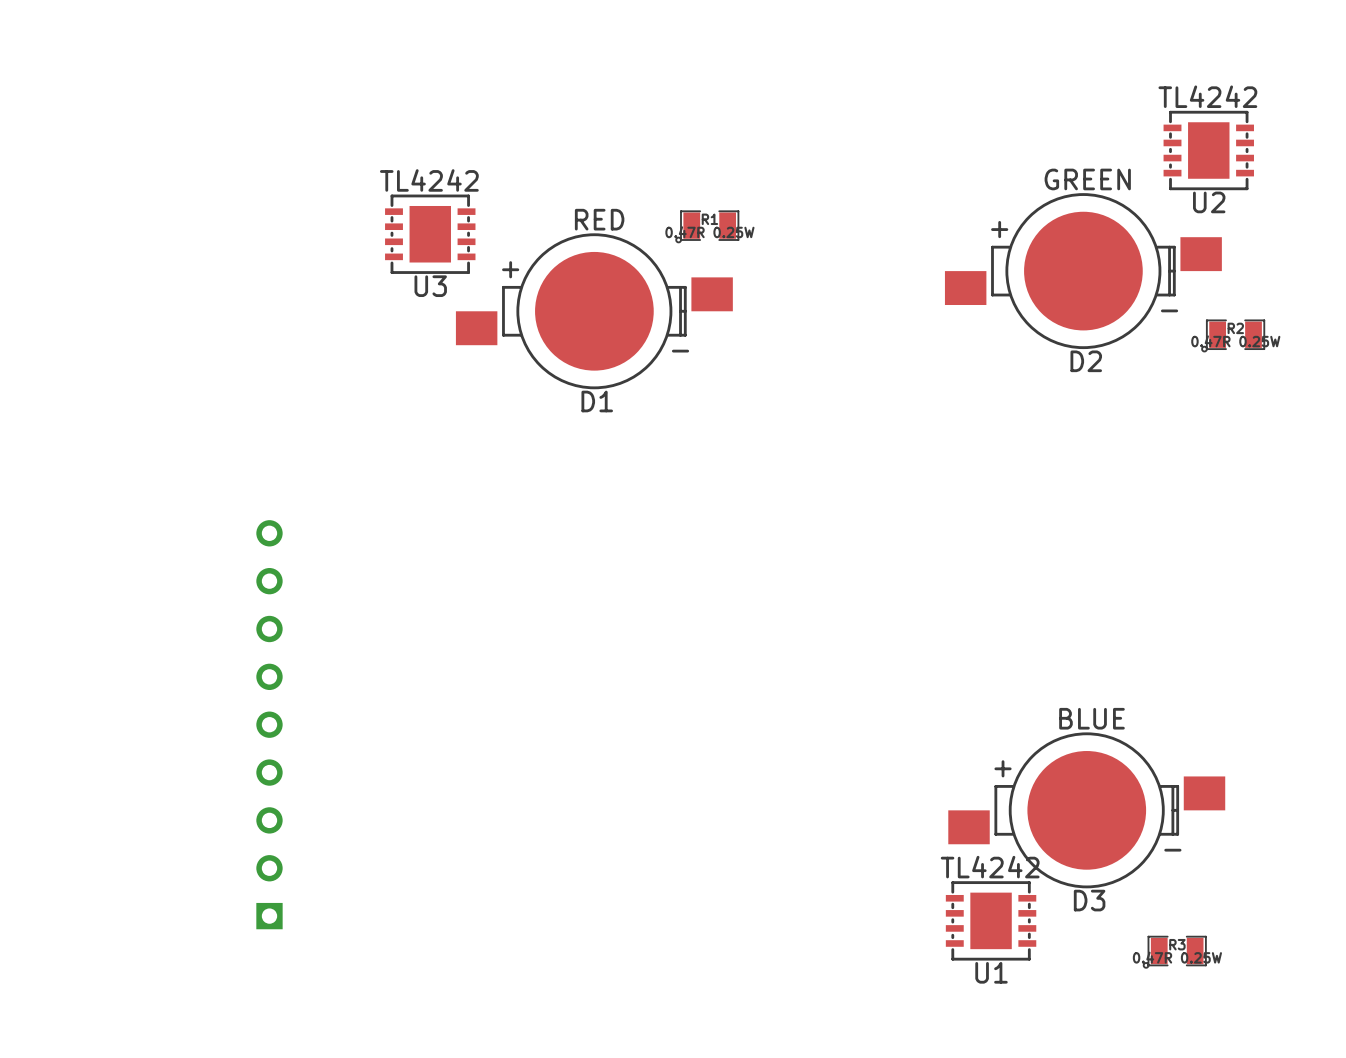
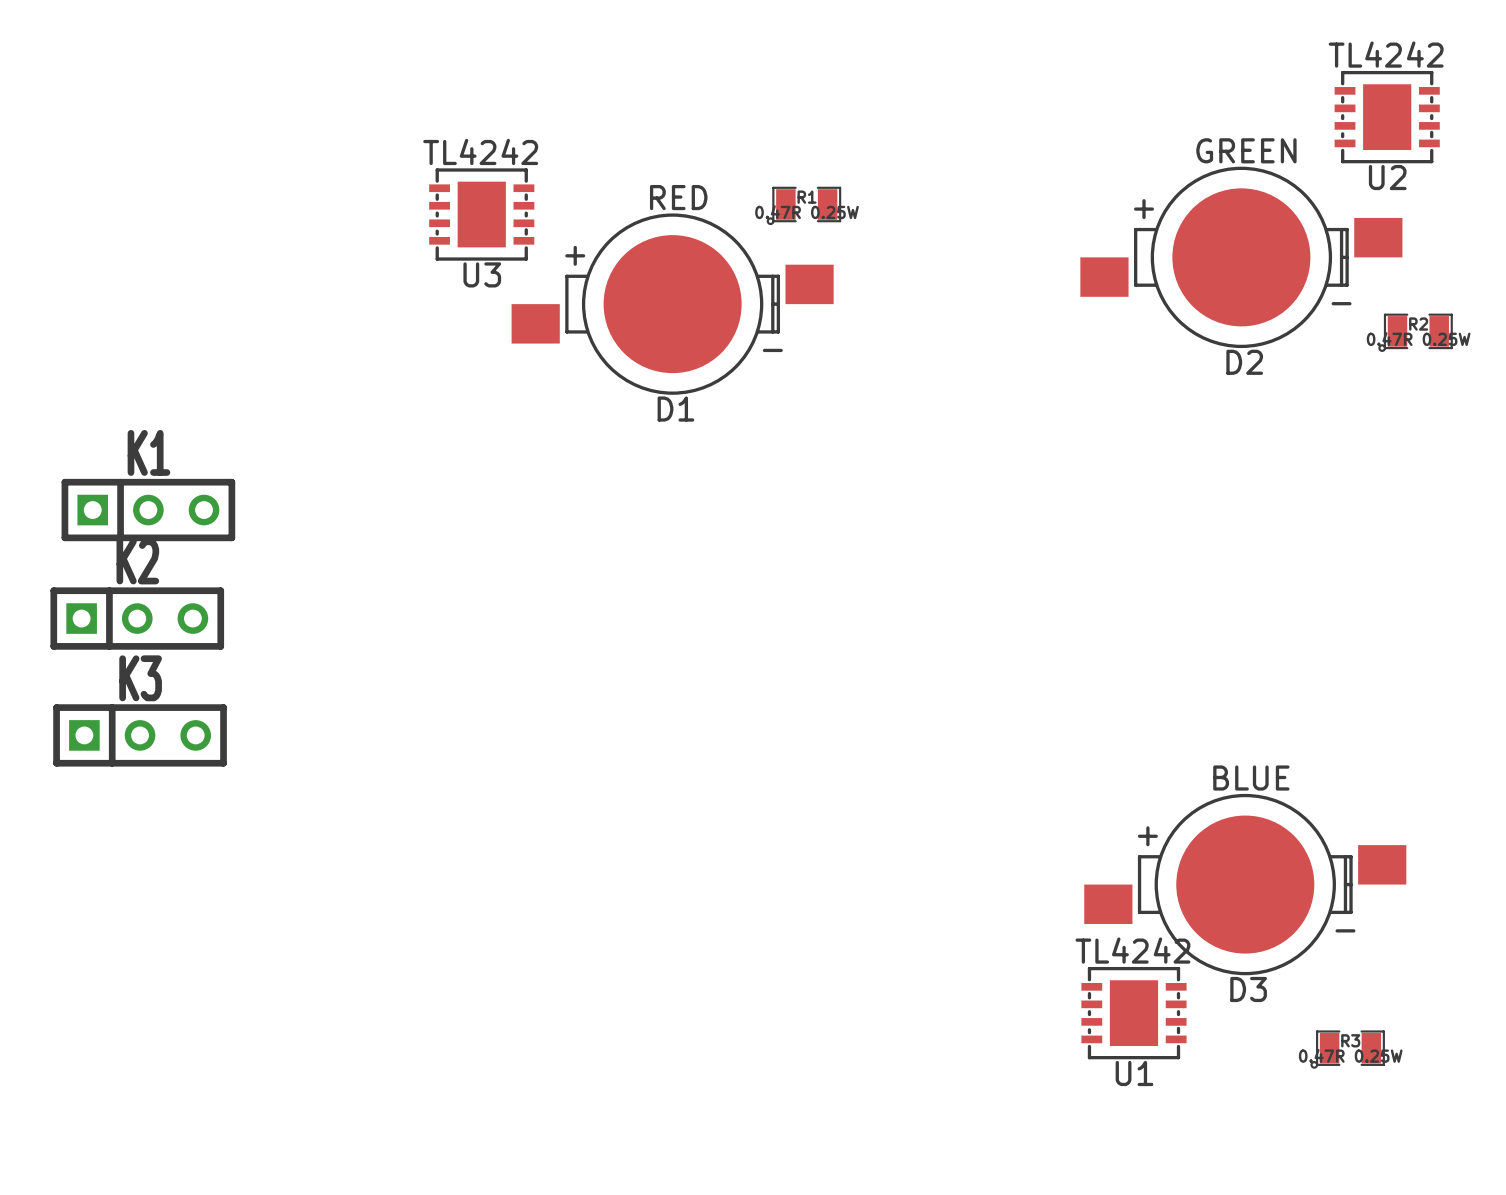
K1: none -> (148, 510)
K2: none -> (137, 618)
K3: none -> (140, 735)
part: (269, 724) -> none

